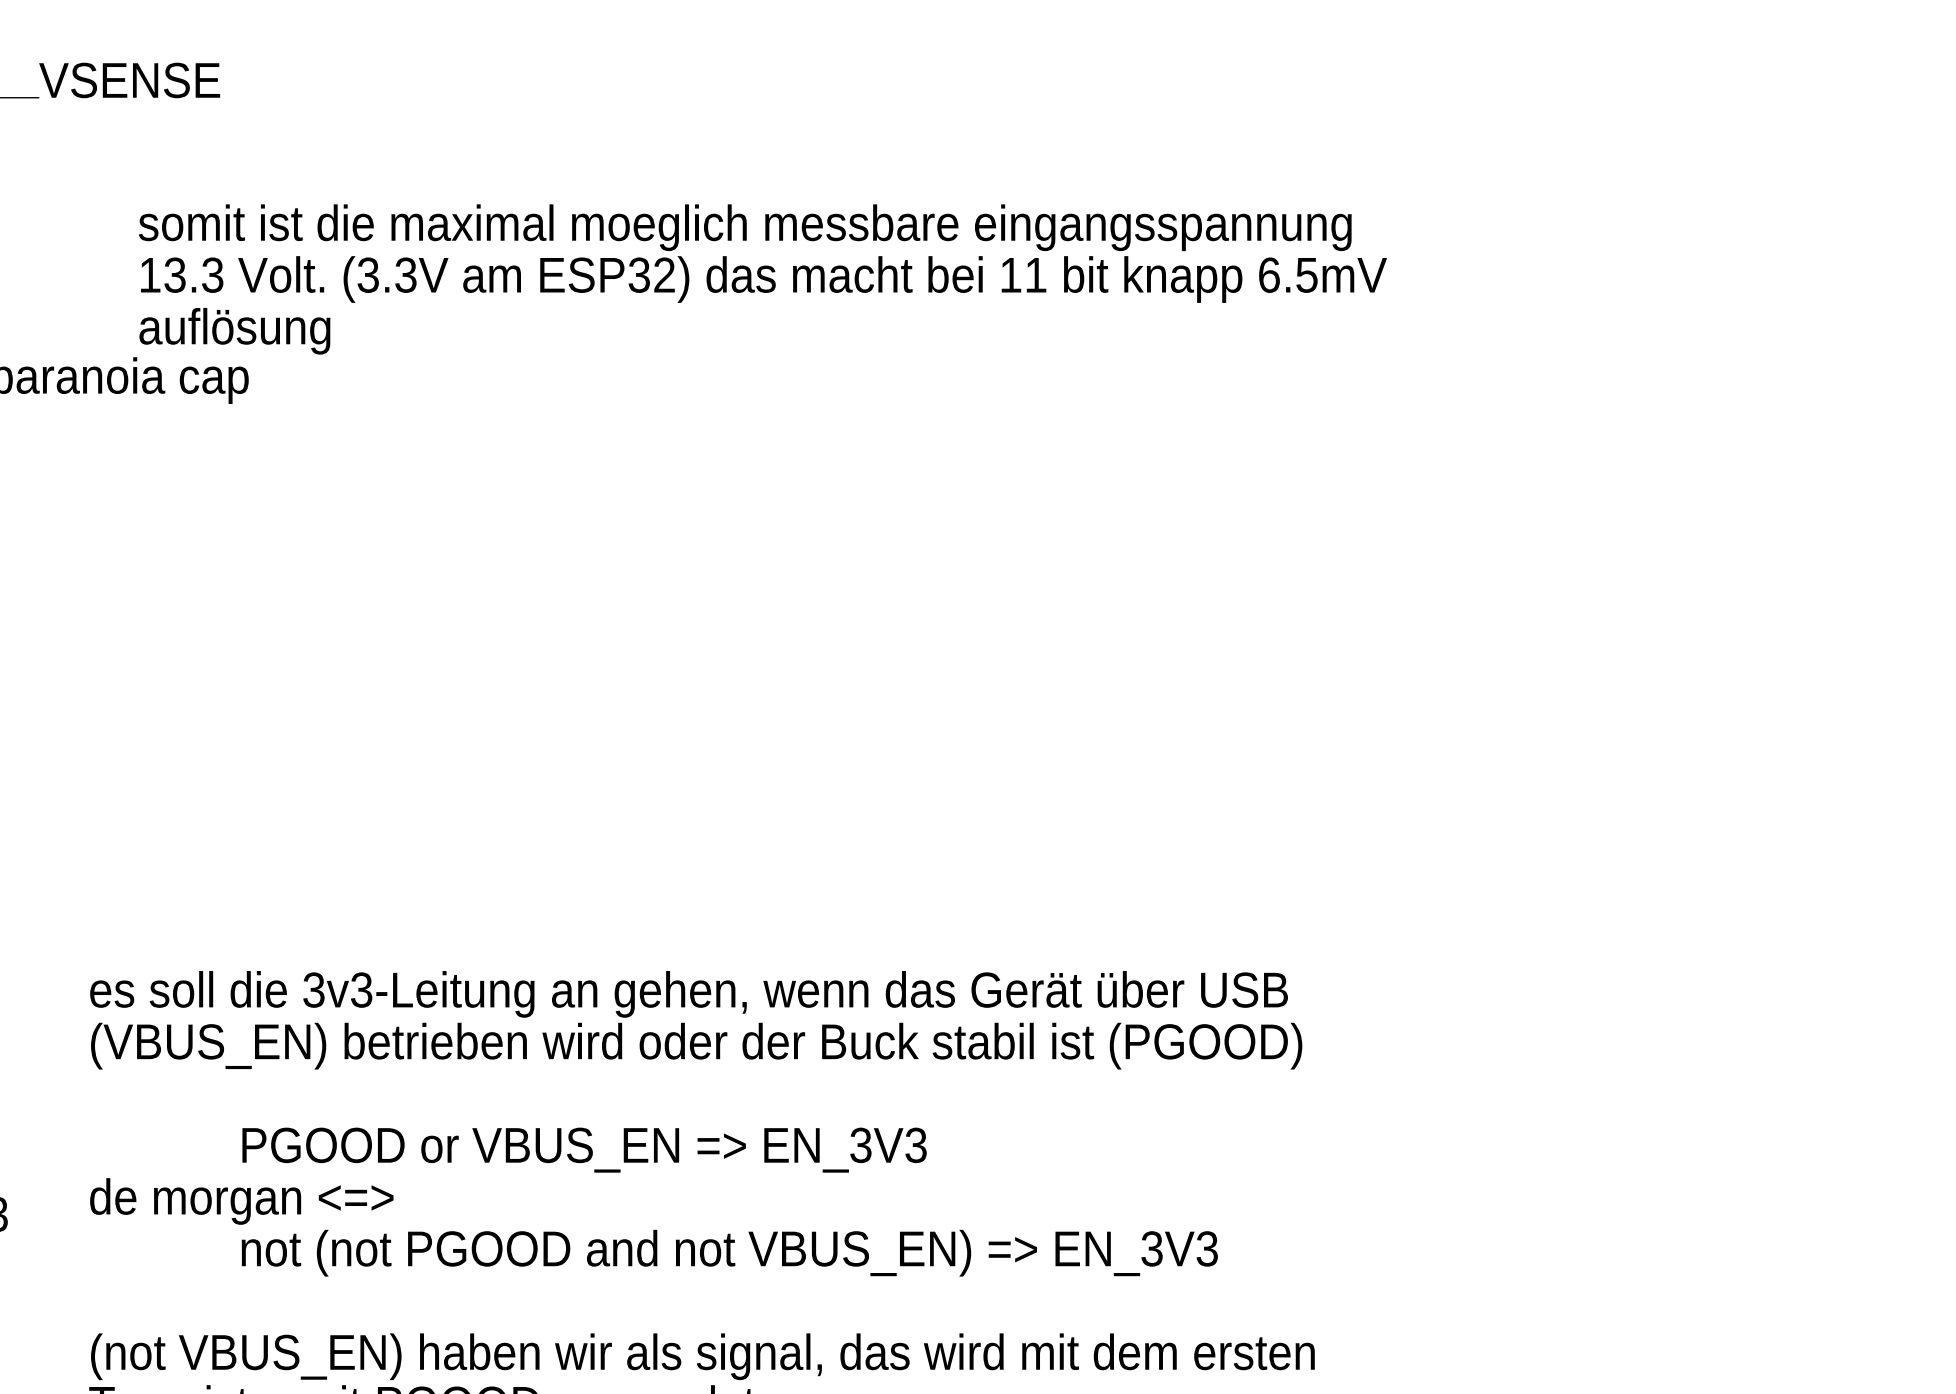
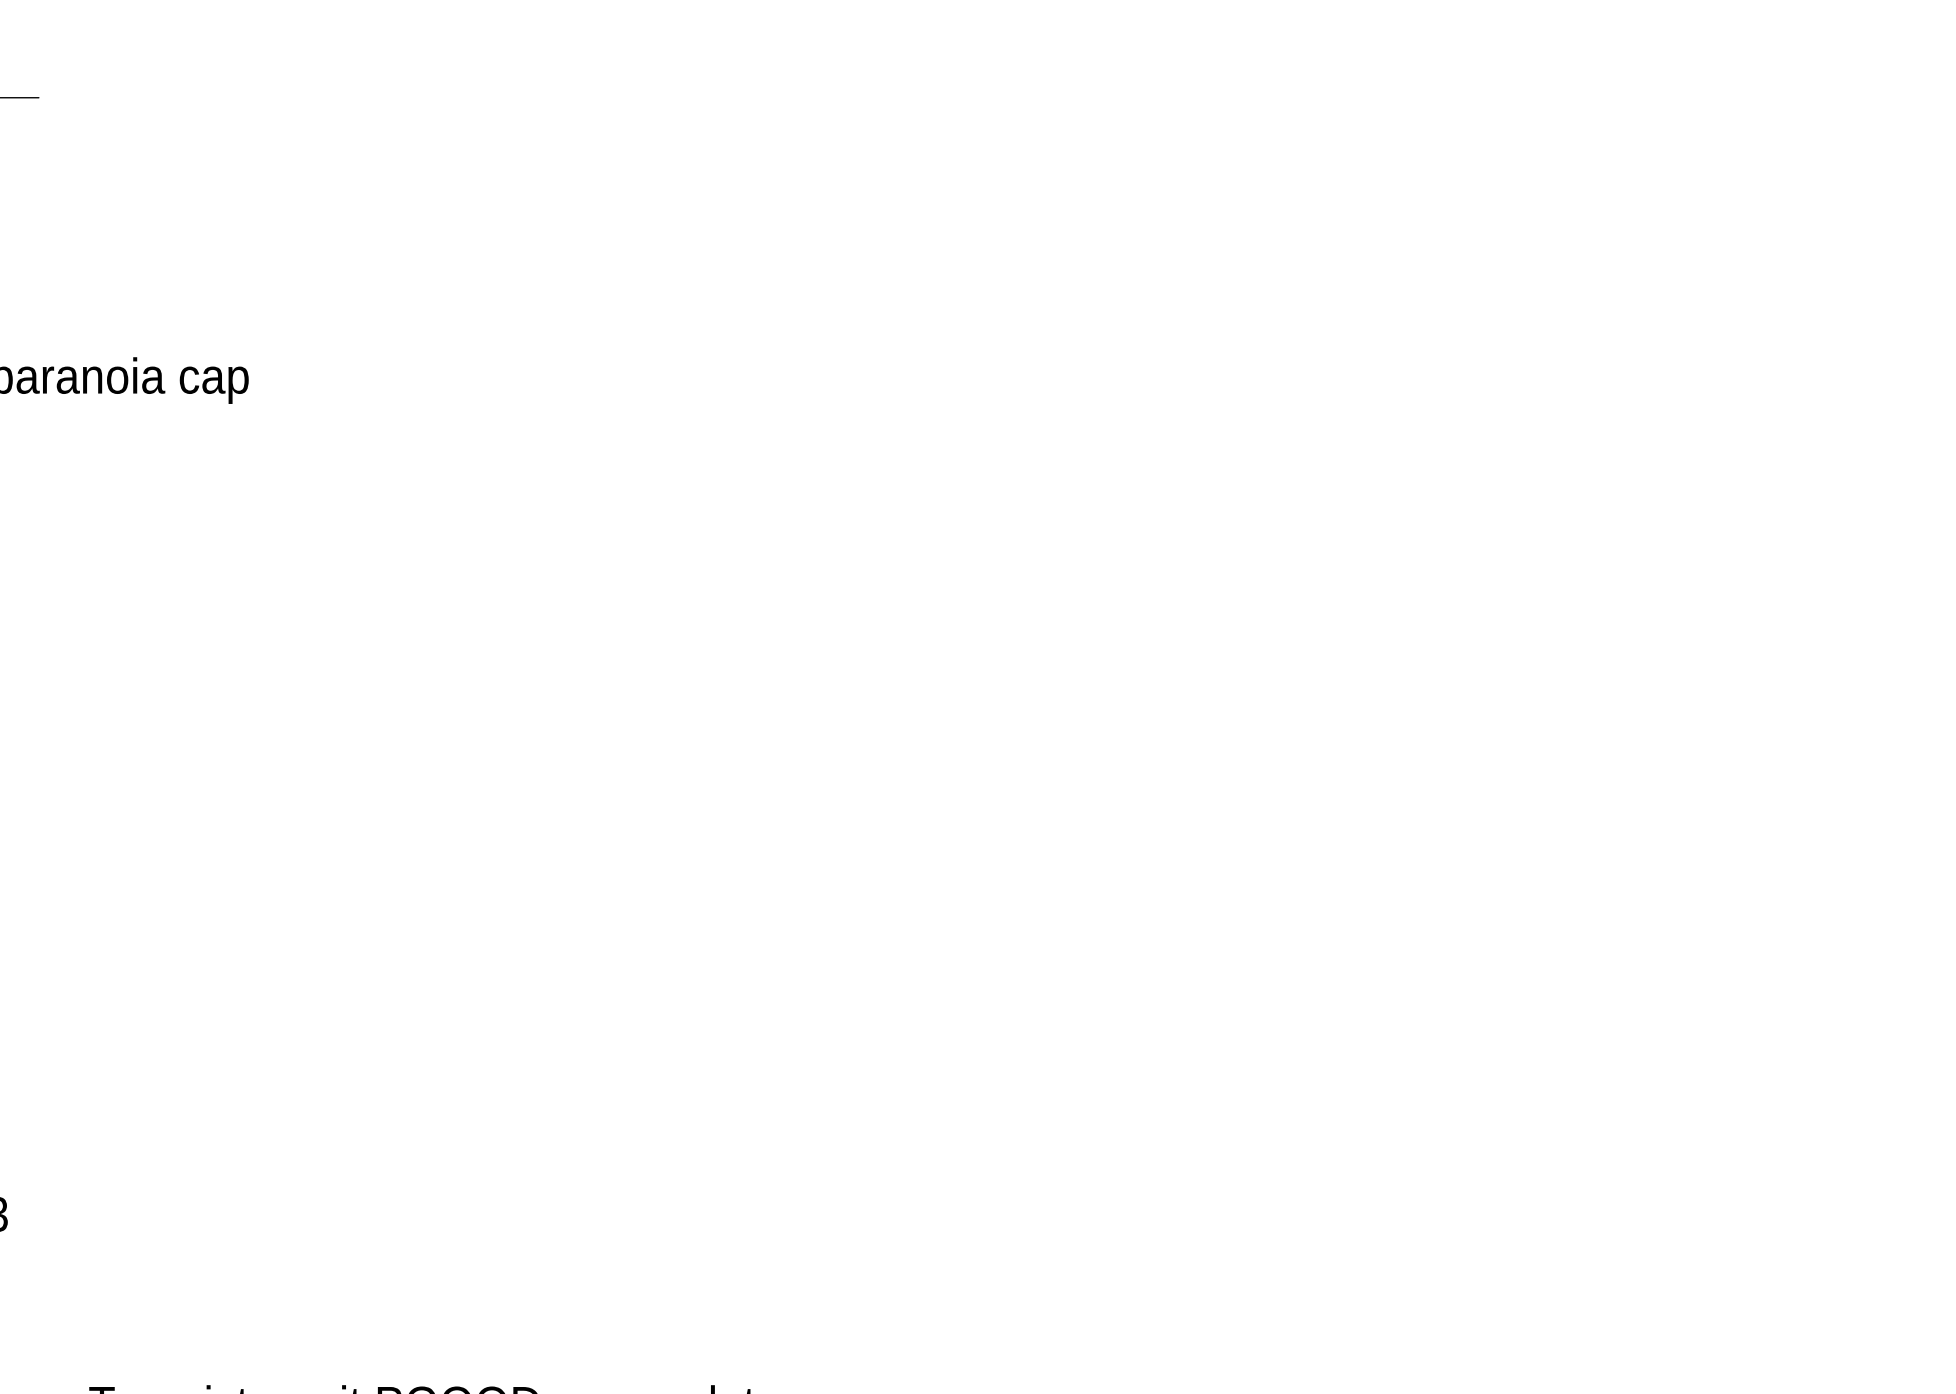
label: VSENSE (129, 80) -> none
text: somit ist die maximal moeglich messbare eingangsspannung (745, 227) -> none
text: 13.3 Volt. (3.3V am ESP32) das macht bei 11 bit knapp 6.5mV (764, 279) -> none
text: auflösung (234, 331) -> none
text: es soll die 3v3-Leitung an gehen, wenn das Gerät über USB (689, 994) -> none
text: (VBUS_EN) betrieben wird oder der Buck stabil ist (PGOOD) (696, 1046) -> none
text: PGOOD or VBUS_EN => EN_3V3 (584, 1150) -> none
text: de morgan <=> (241, 1201) -> none
text: not (not PGOOD and not VBUS_EN) => EN_3V3 (729, 1253) -> none
text: (not VBUS_EN) haben wir als signal, das wird mit dem ersten (702, 1356) -> none

